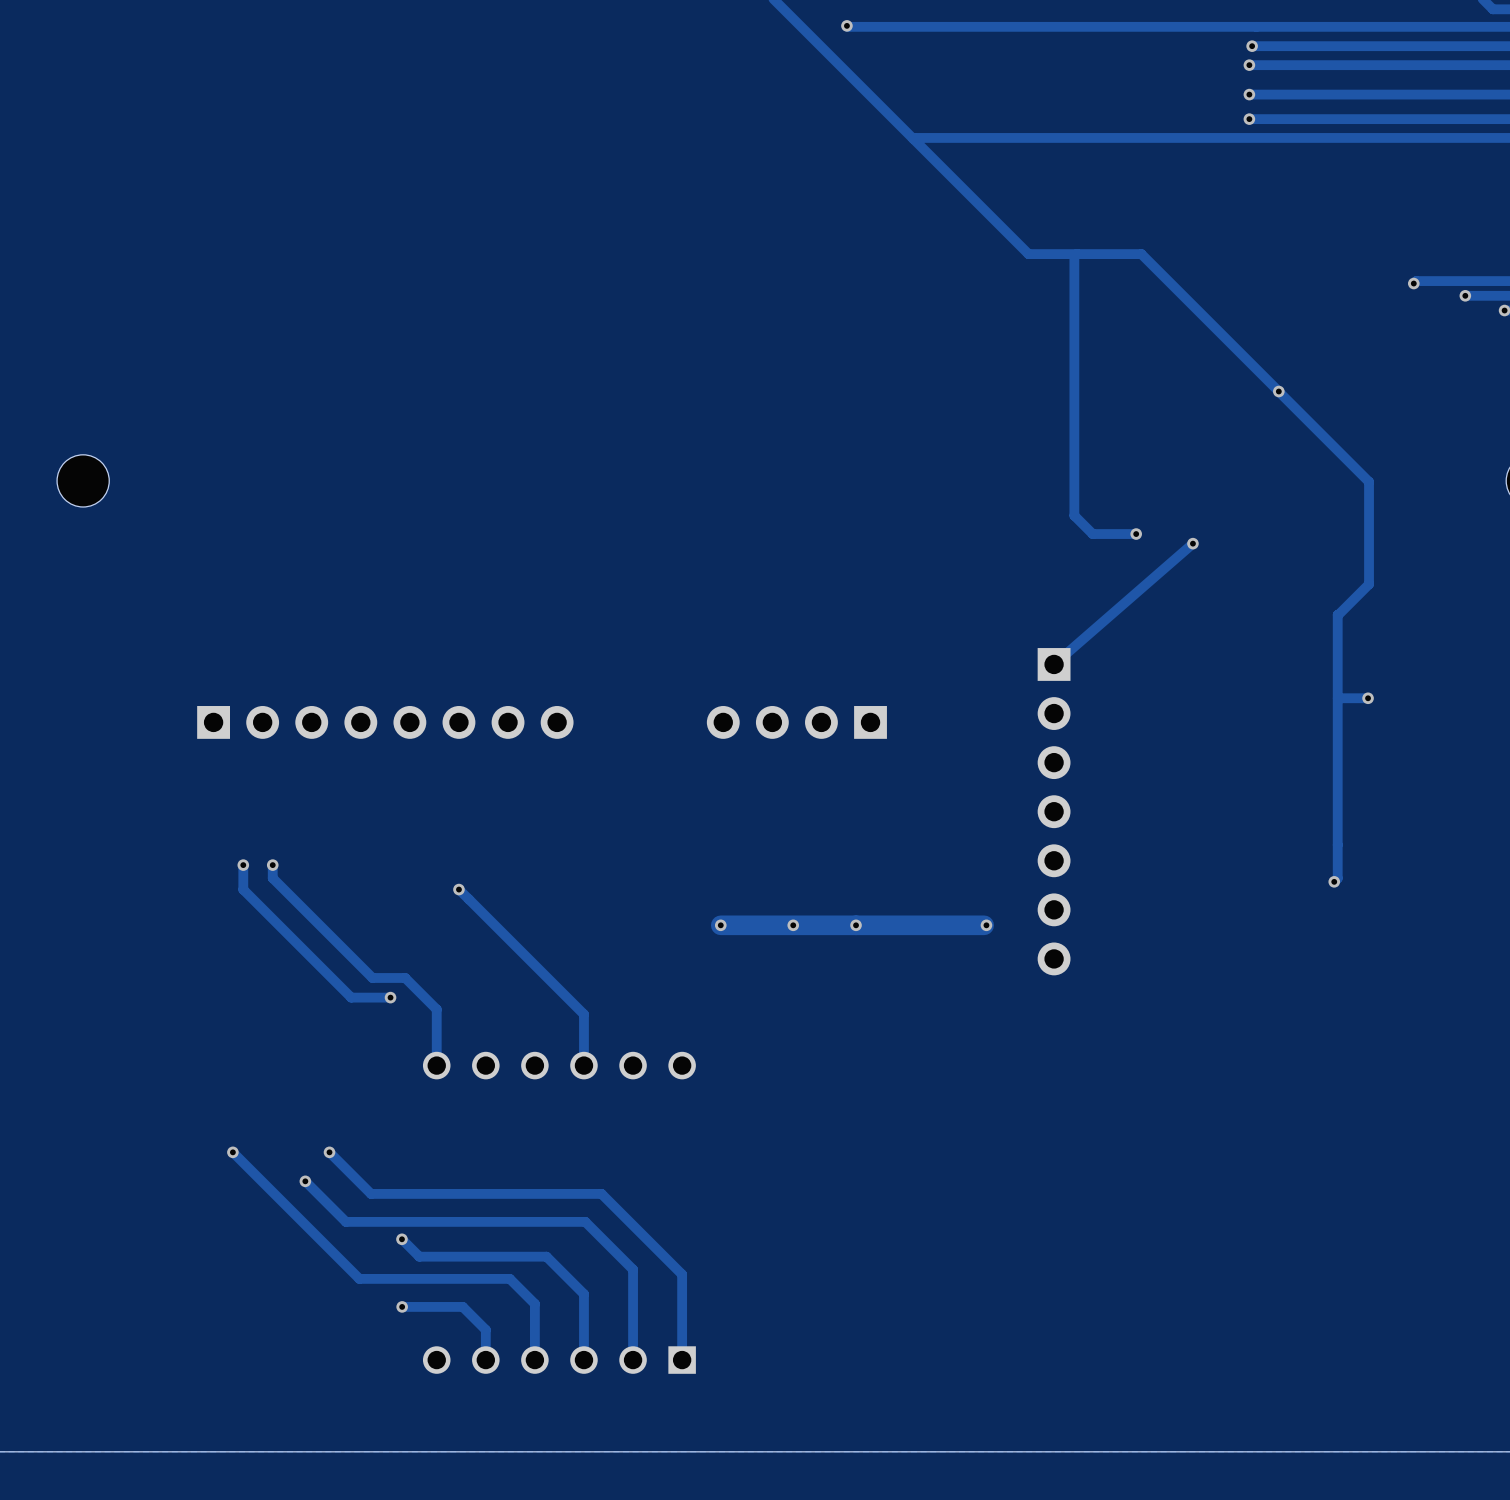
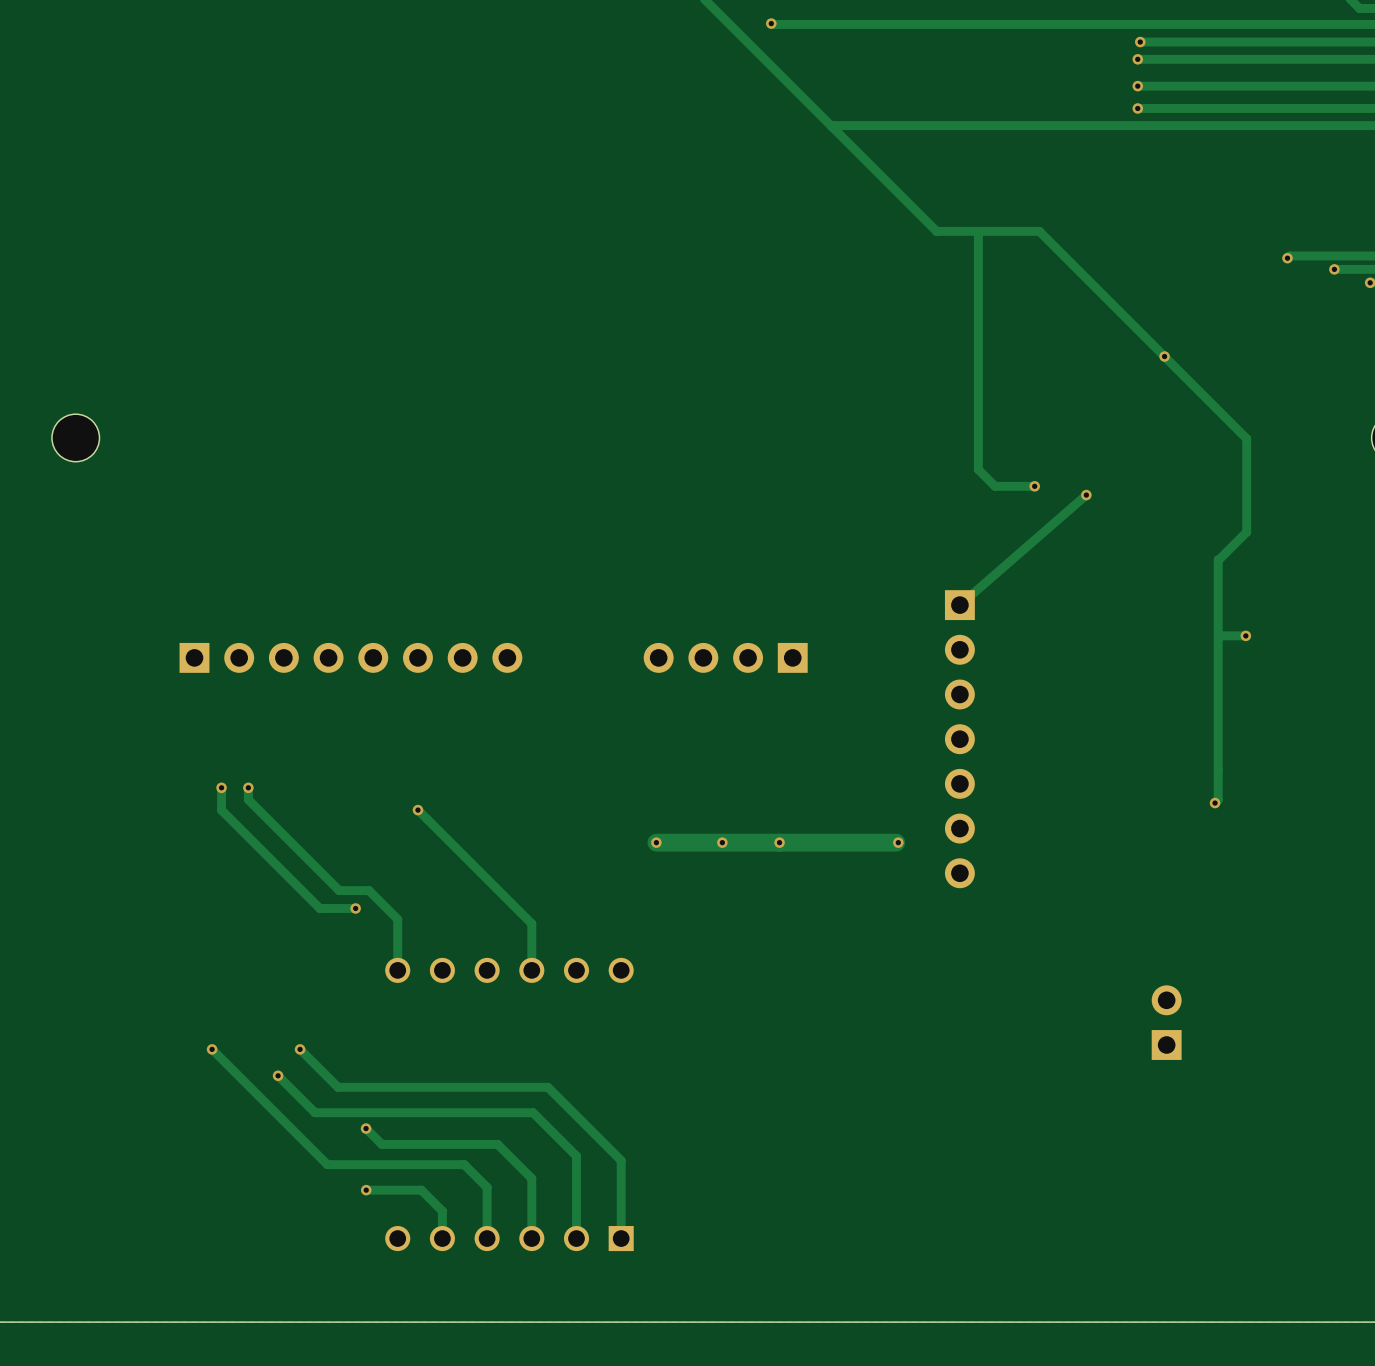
part: none -> (1166, 1022)

